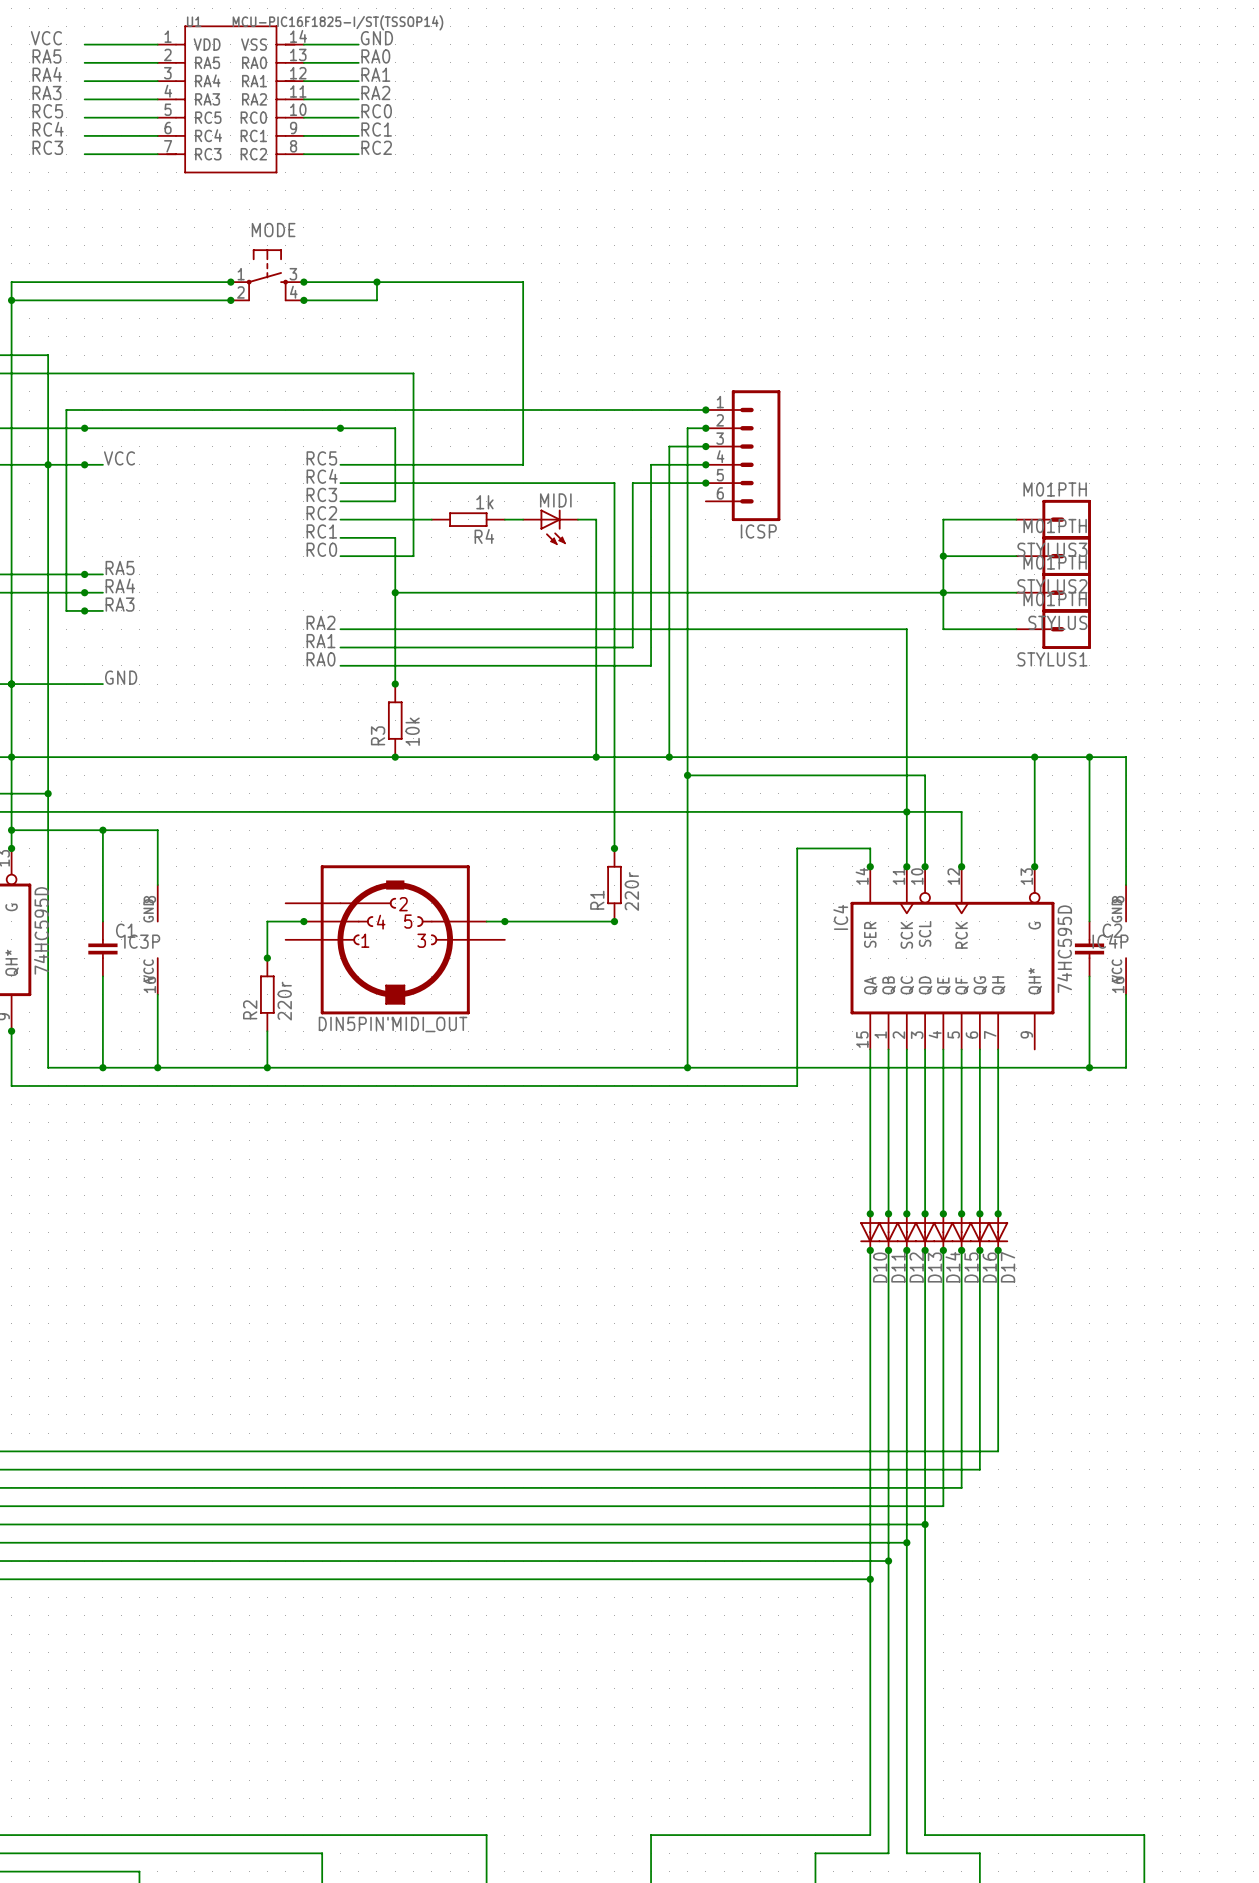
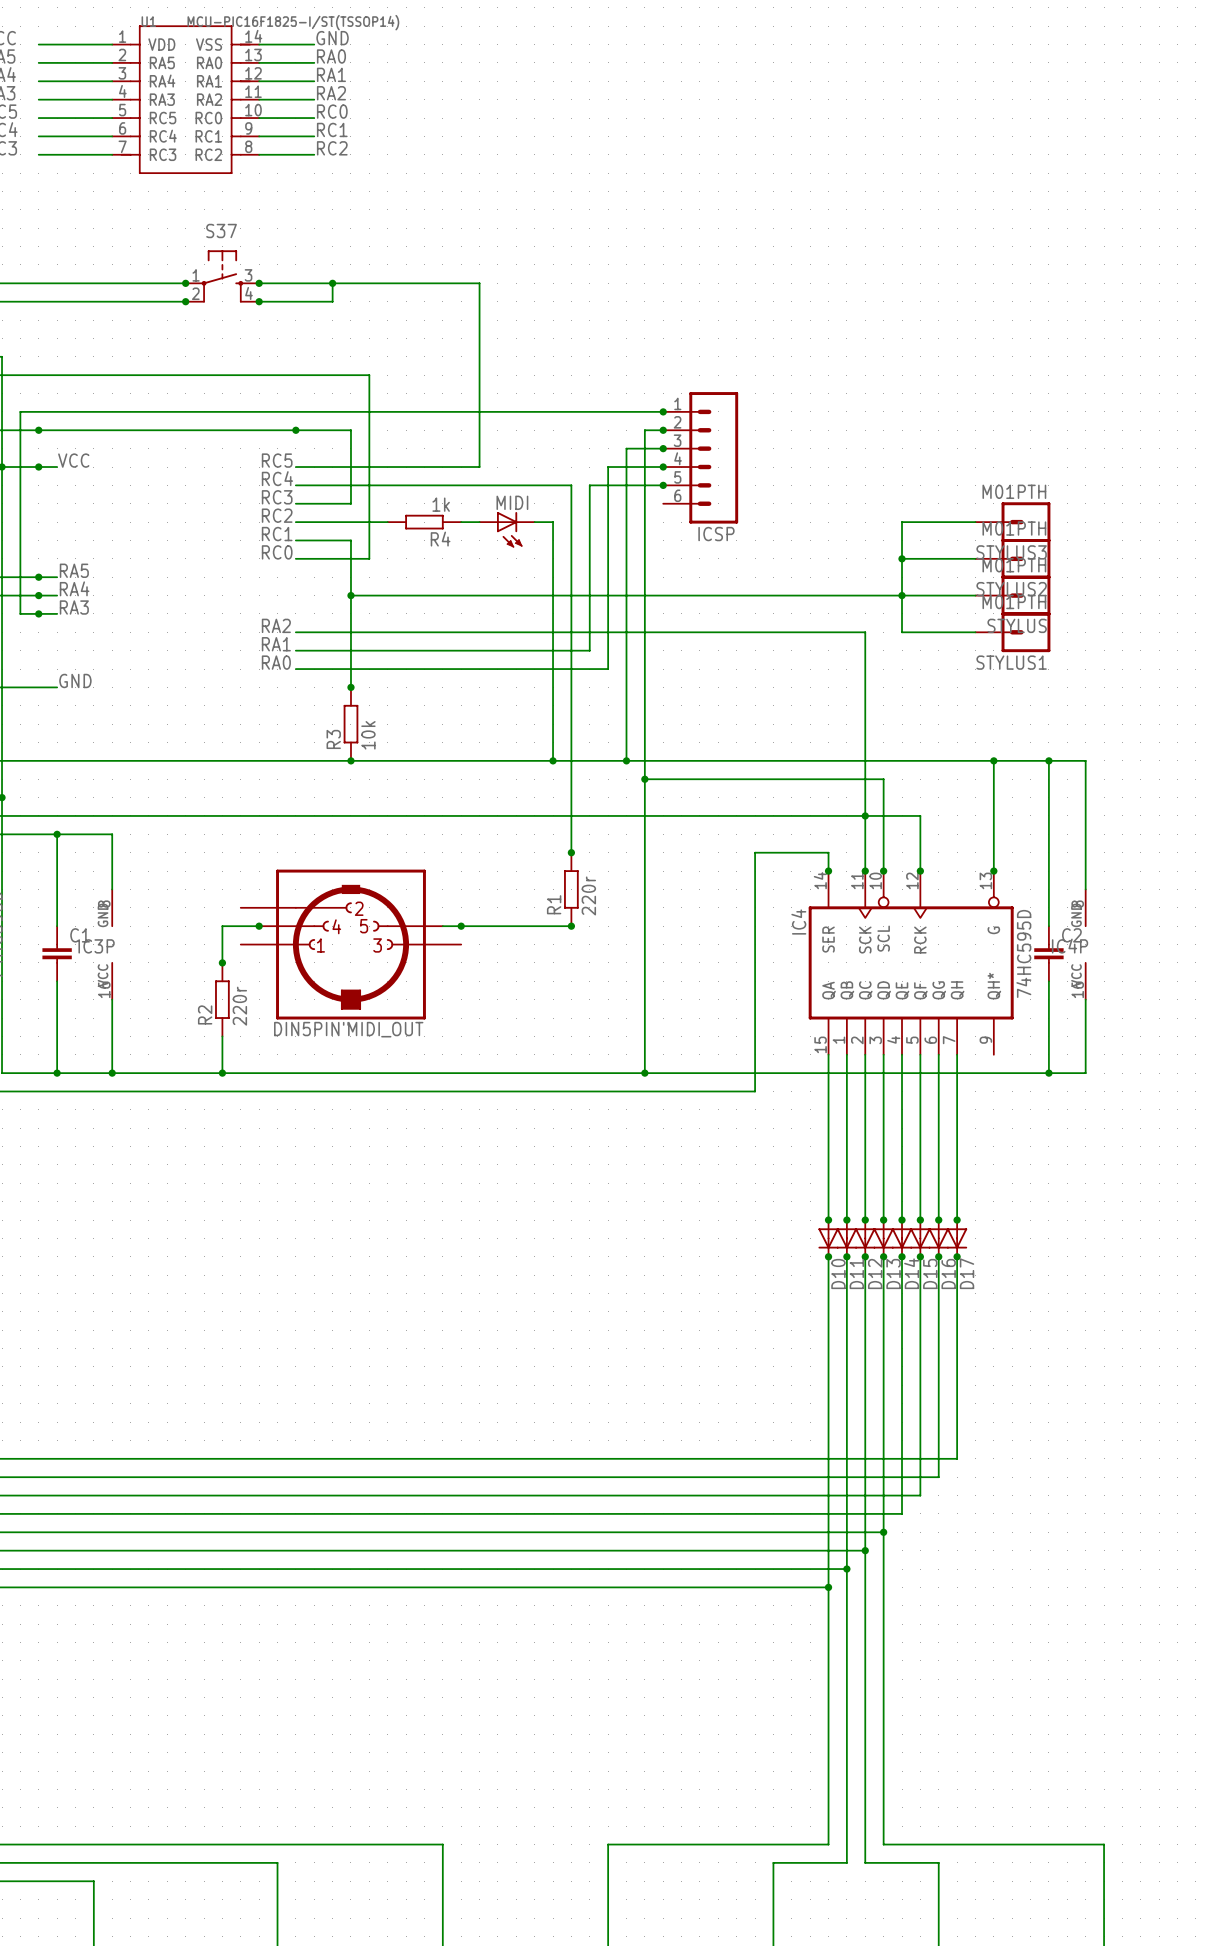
MODE name: MODE (273, 230) -> S37 (221, 230)

